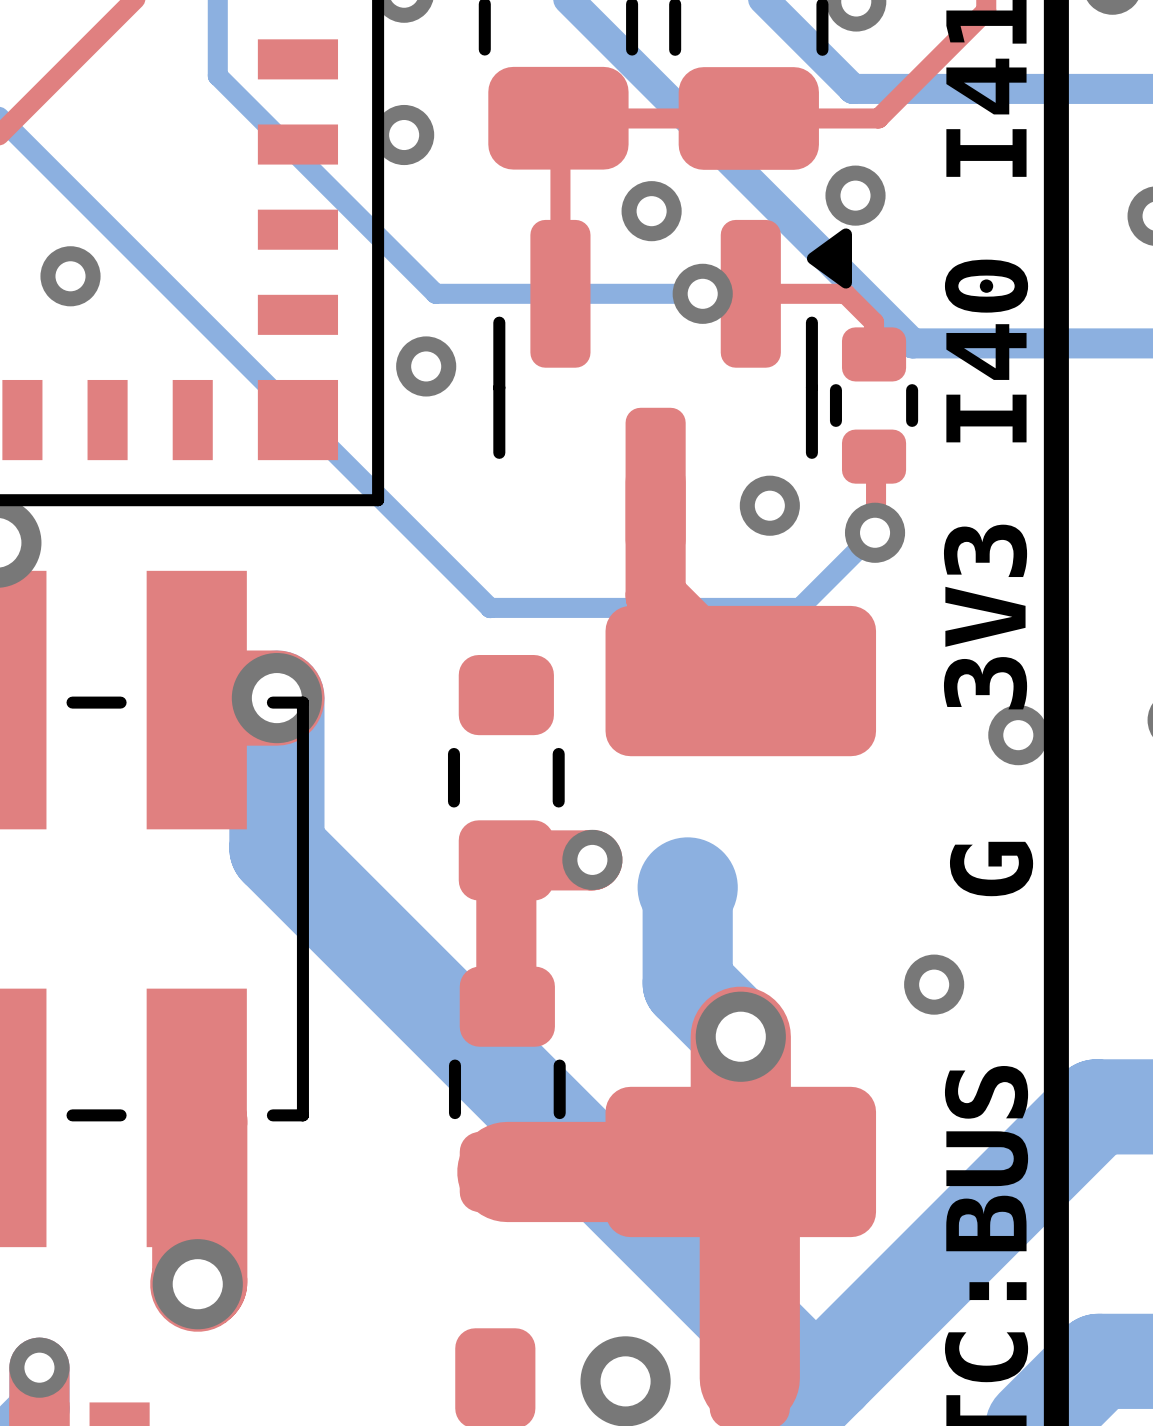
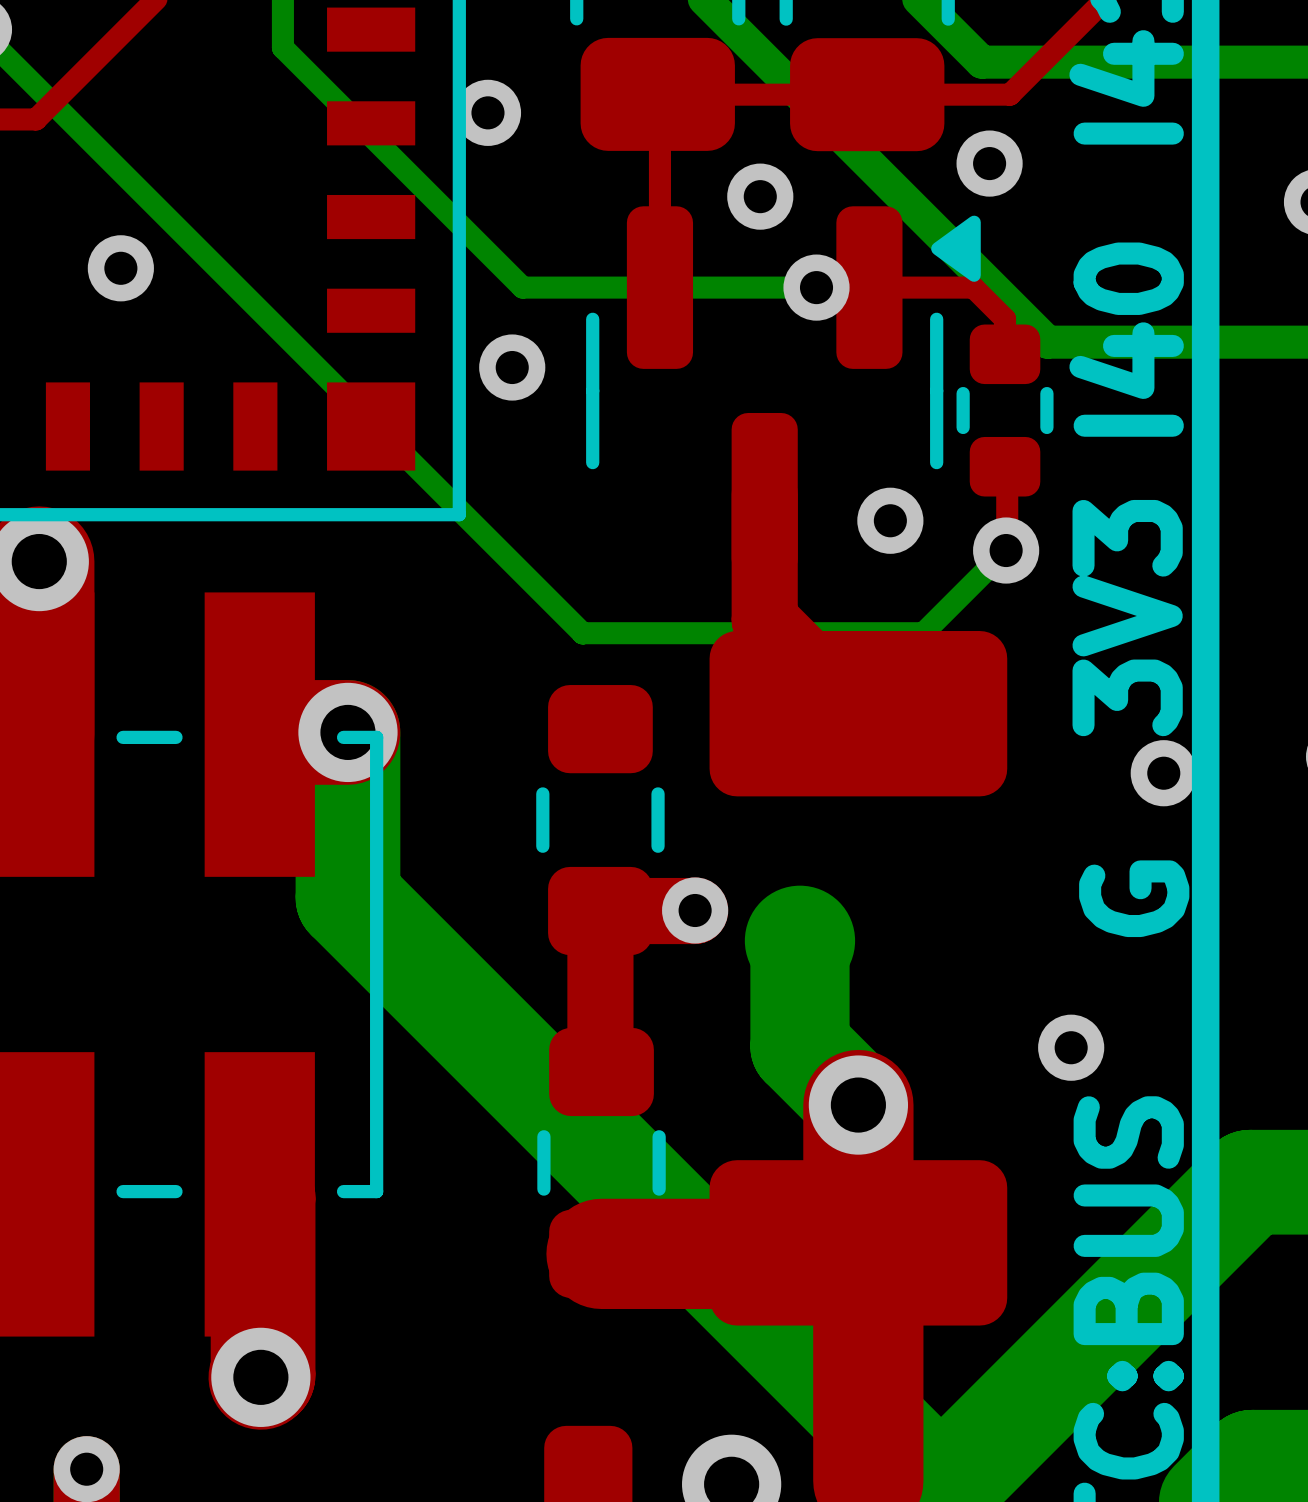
via position: (855, 195) -> (989, 163)

